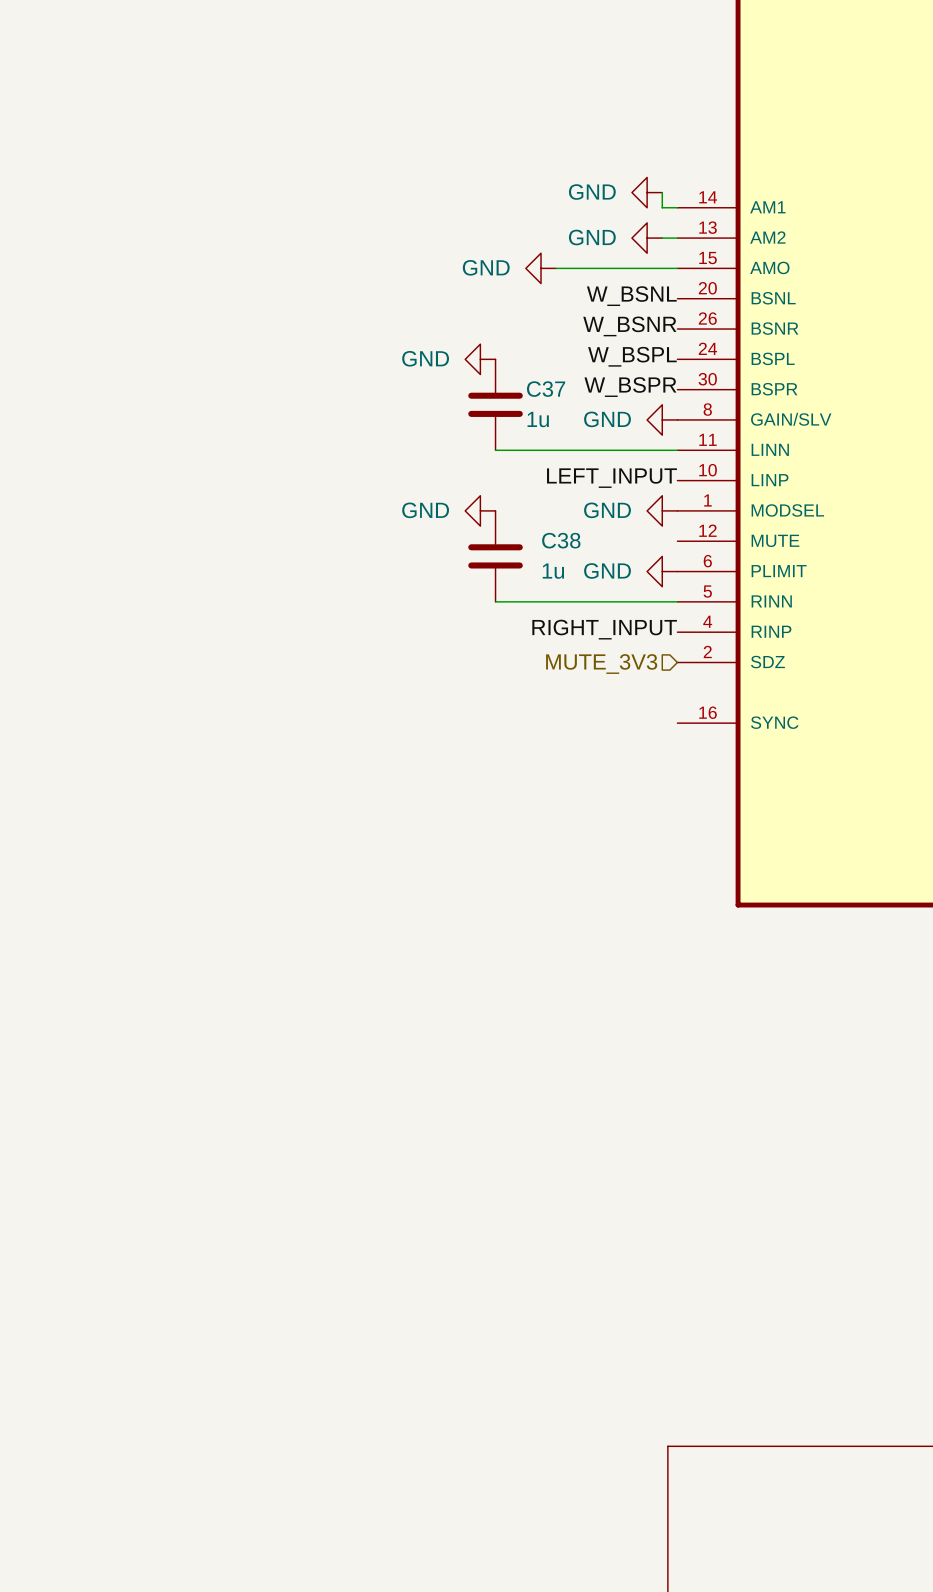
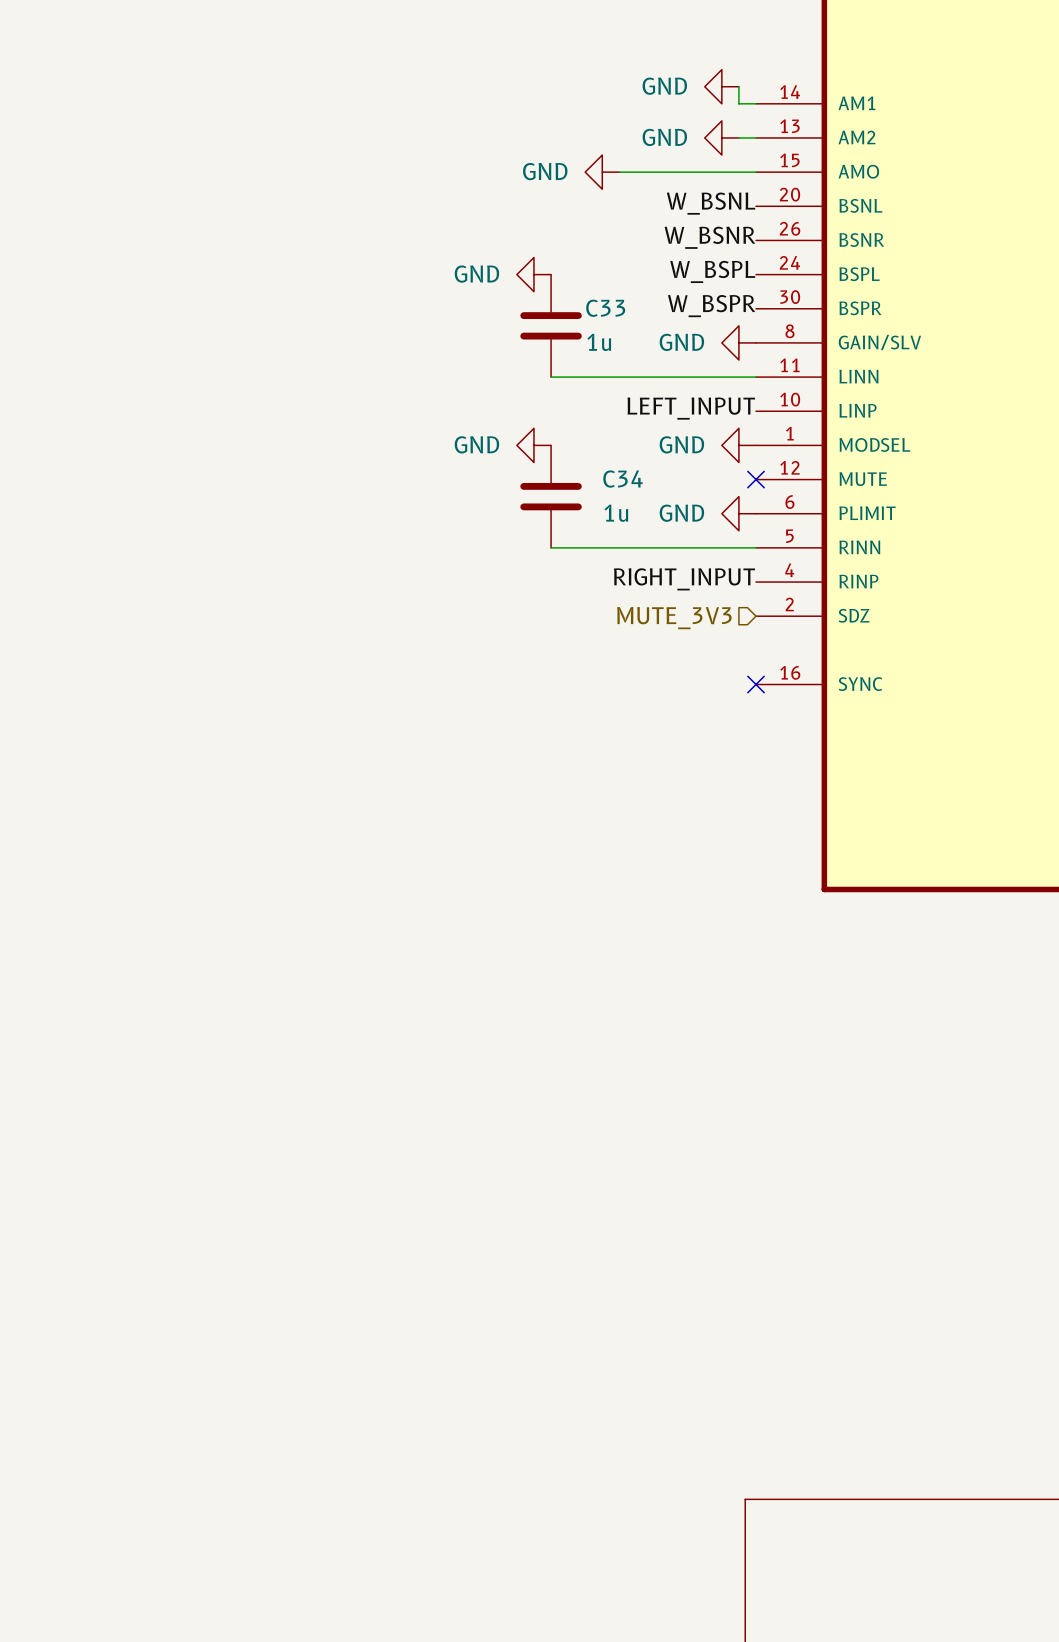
C37 name: C37 (546, 389) -> C33 (605, 308)
C38 name: C38 (561, 540) -> C34 (623, 479)
no-connect mark: none -> (756, 479)
no-connect mark: none -> (756, 684)

